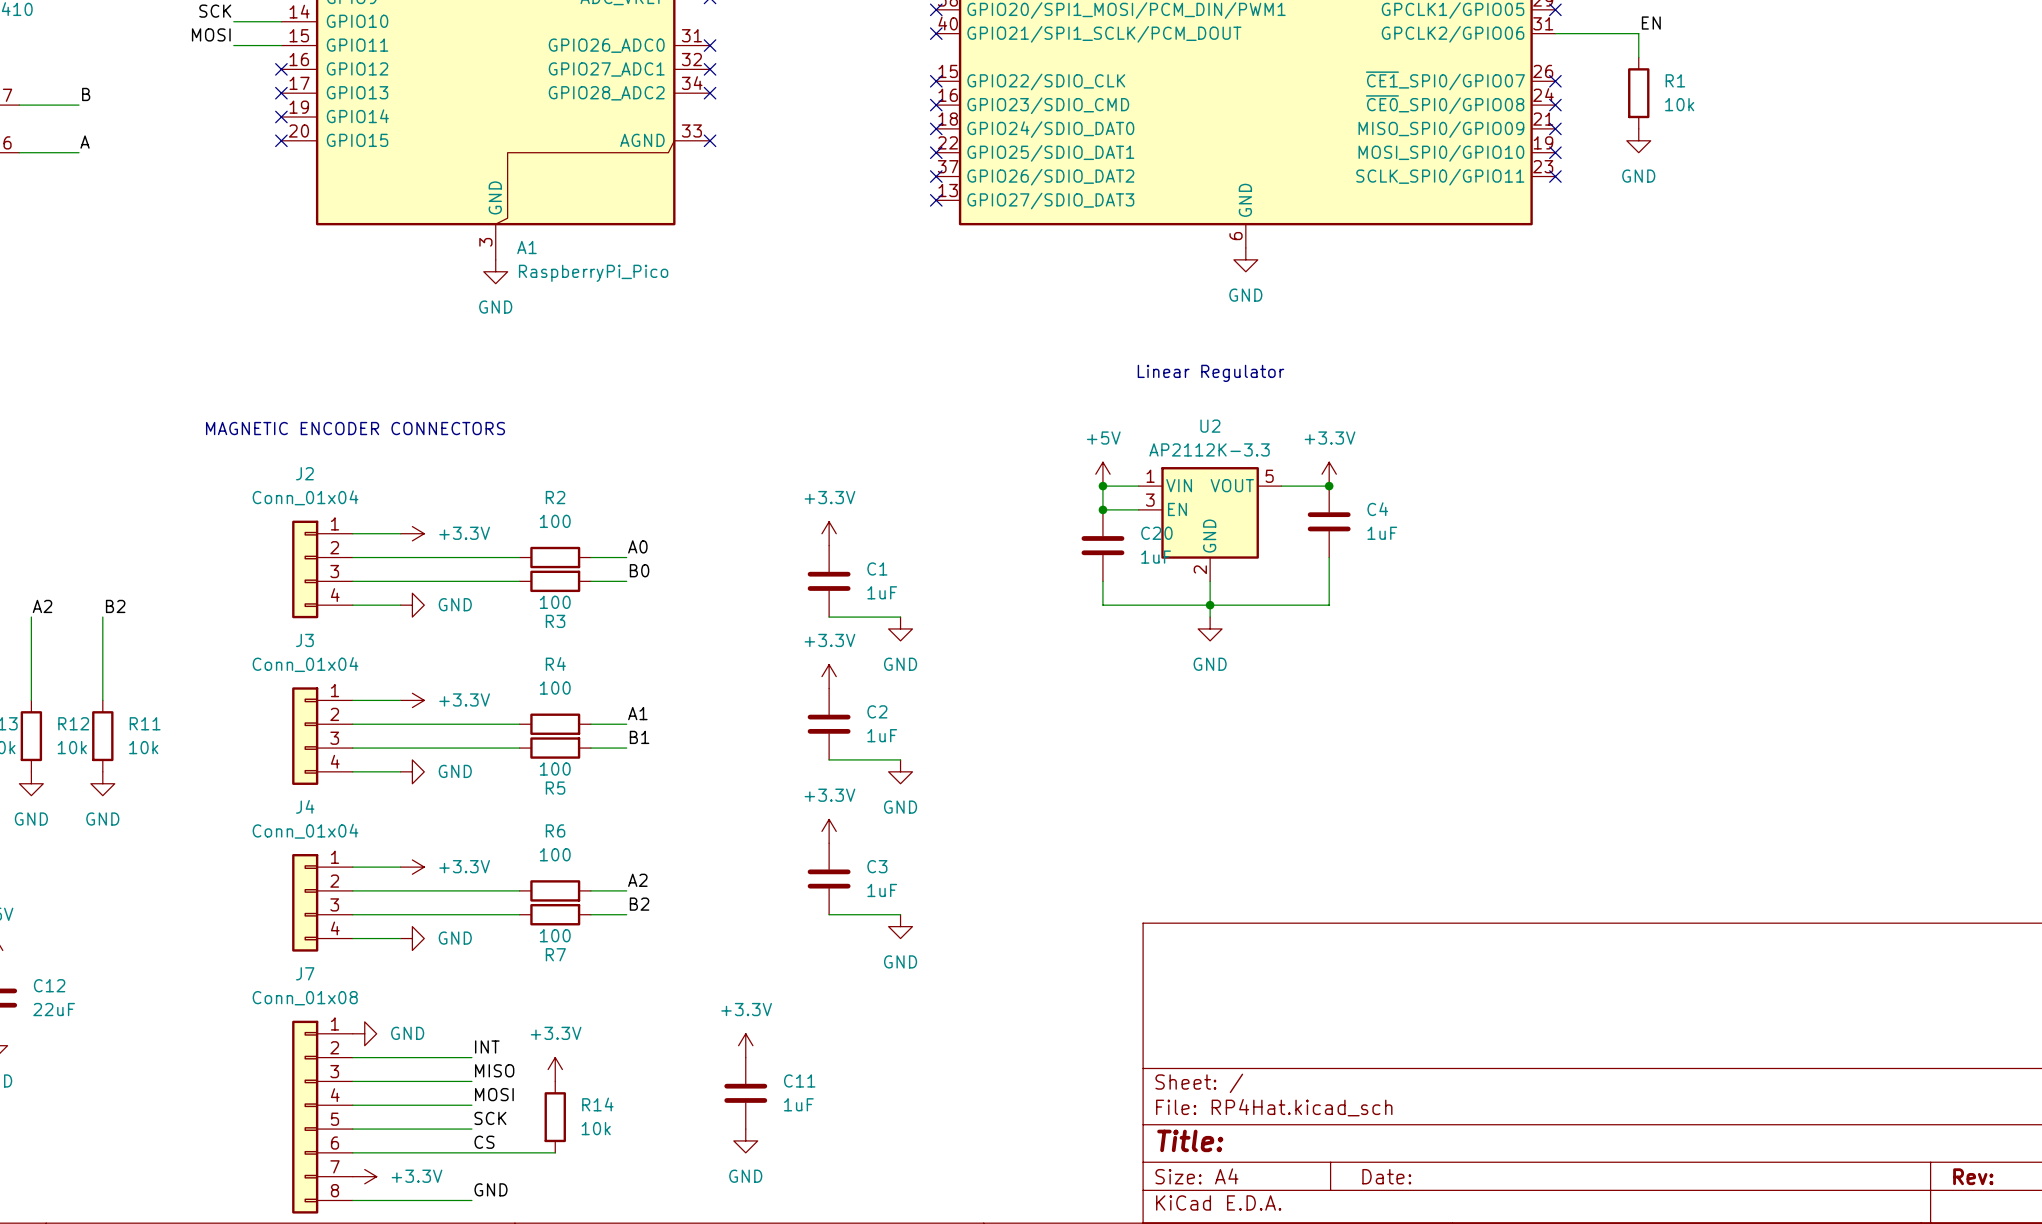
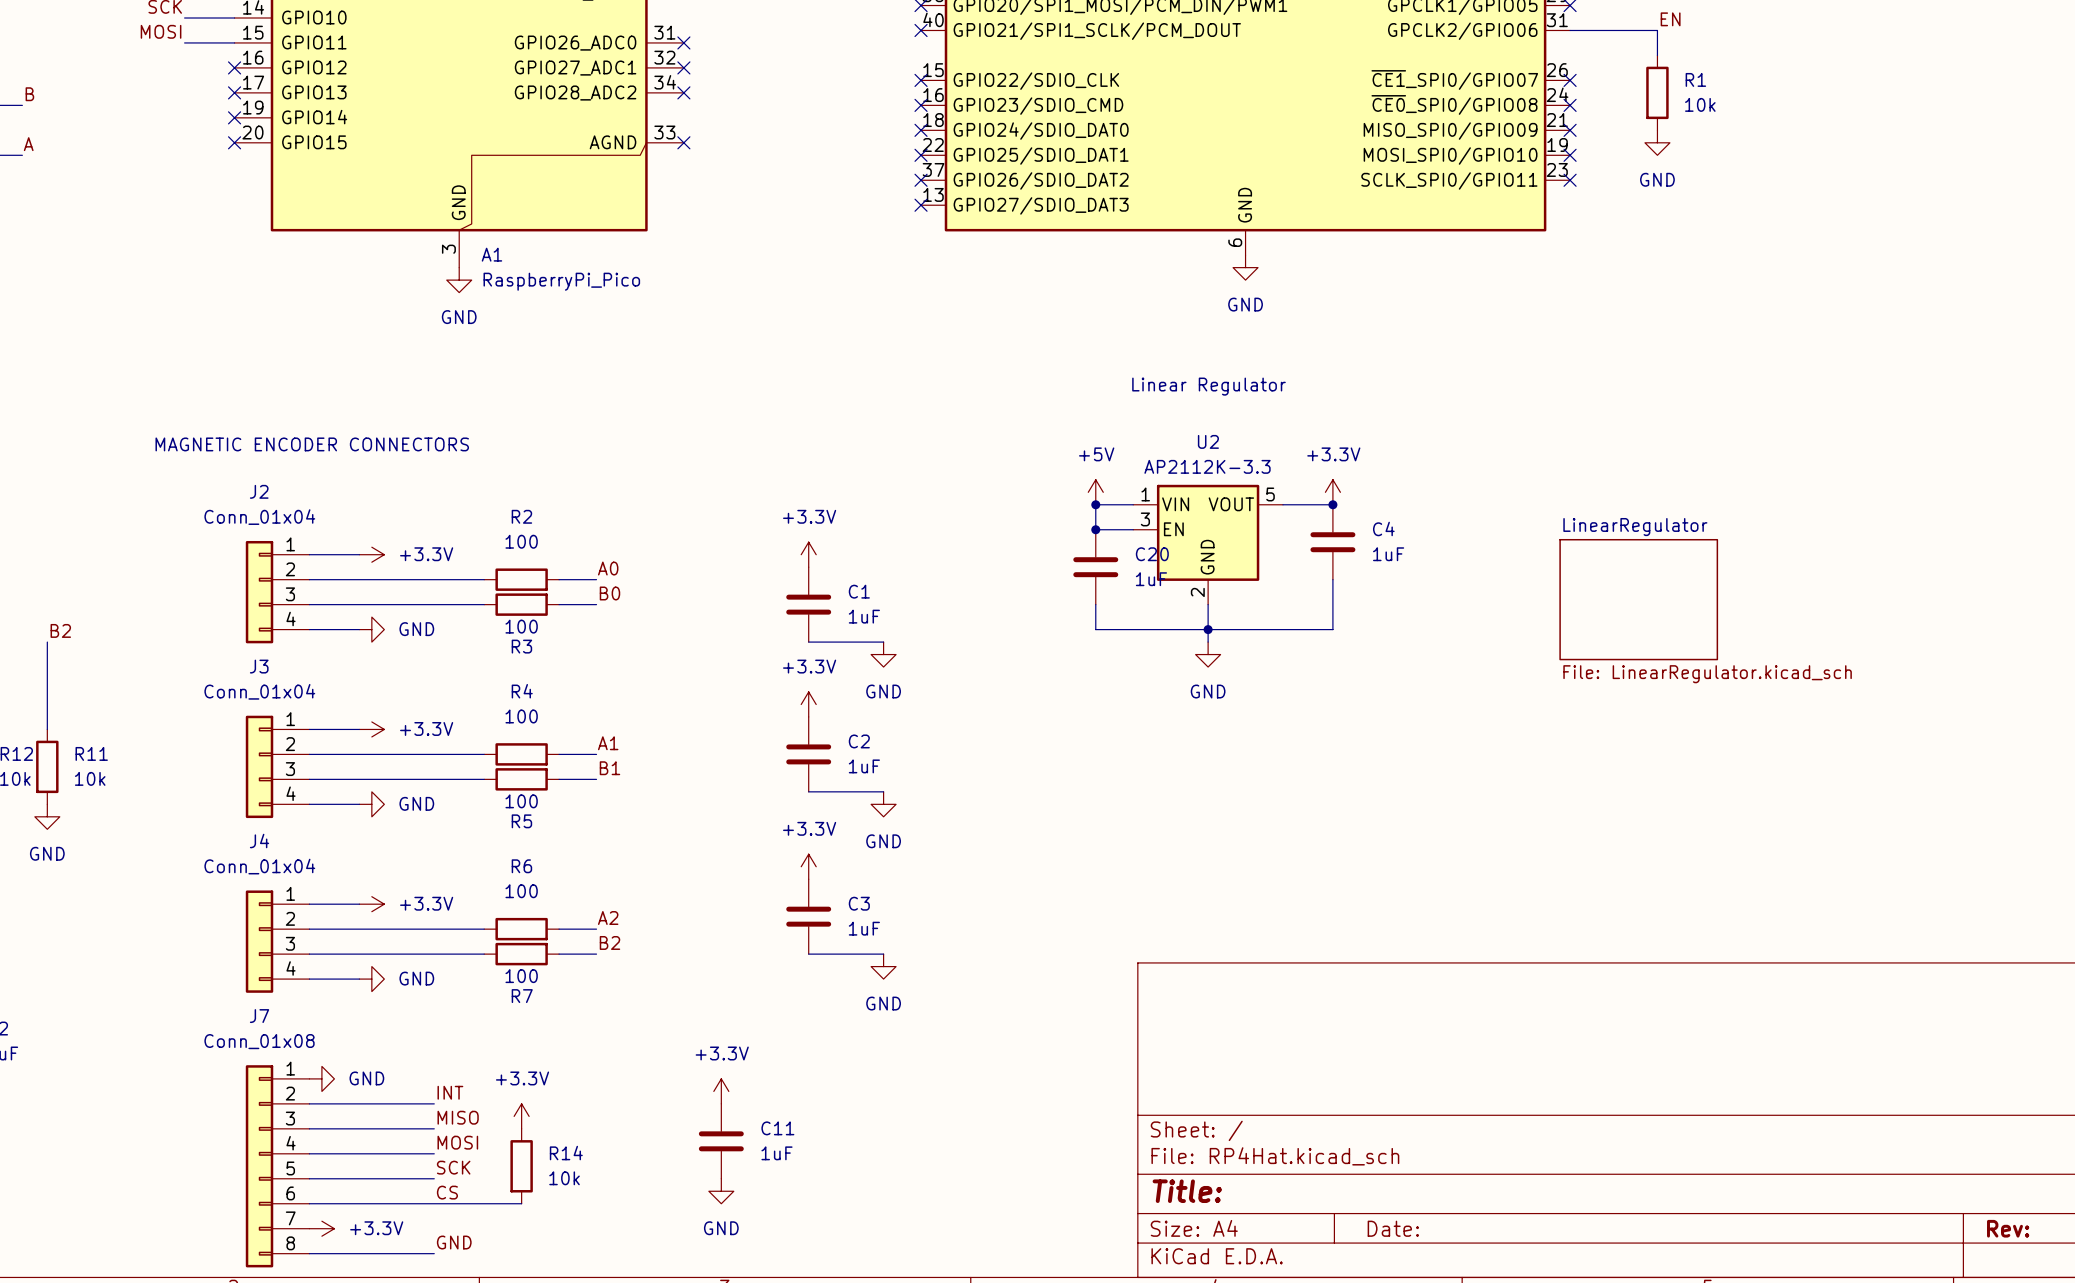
sheet LinearRegulator: none -> File: LinearRegulator.kicad_sch (1638, 599)

